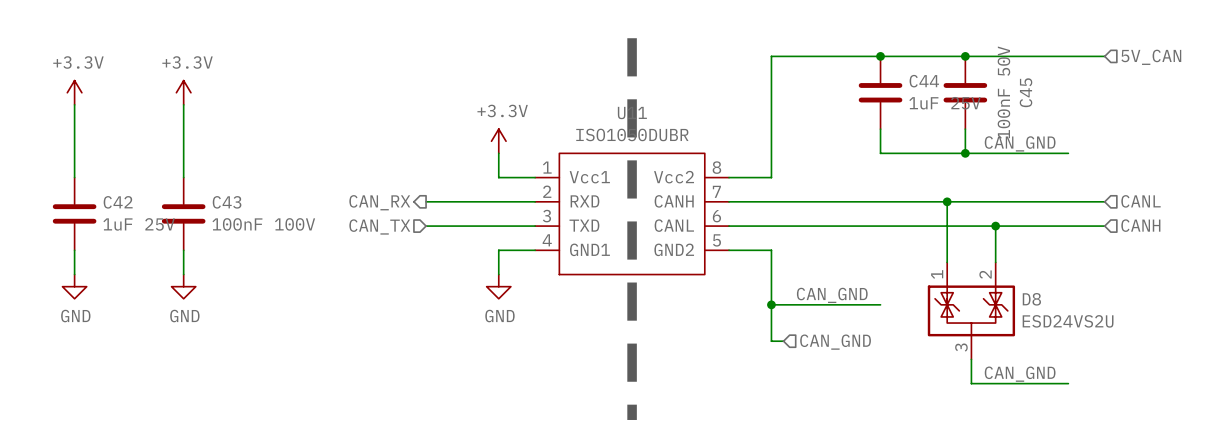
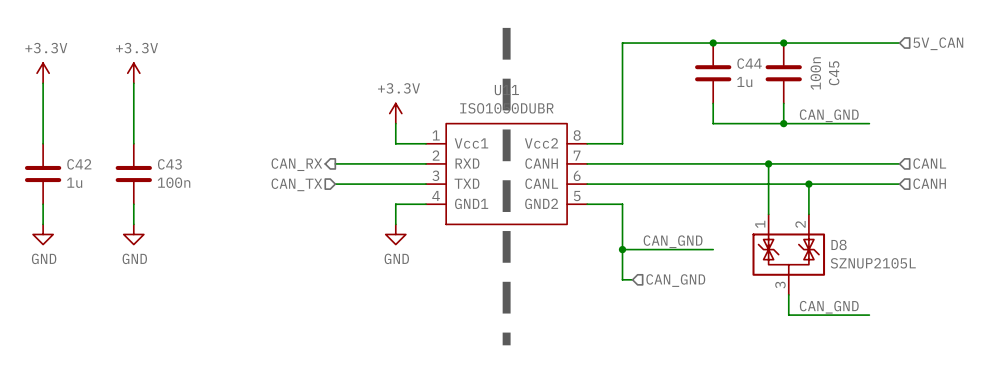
C45 value: 100nF 50V (1003, 92) -> 100n (815, 73)
C44 value: 1uF 25V (945, 103) -> 1u (744, 82)
C42 value: 1uF 25V (139, 224) -> 1u (74, 182)
C43 value: 100nF 100V (263, 224) -> 100n (174, 182)
D8 value: ESD24VS2U (1068, 321) -> SZNUP2105L (873, 263)

